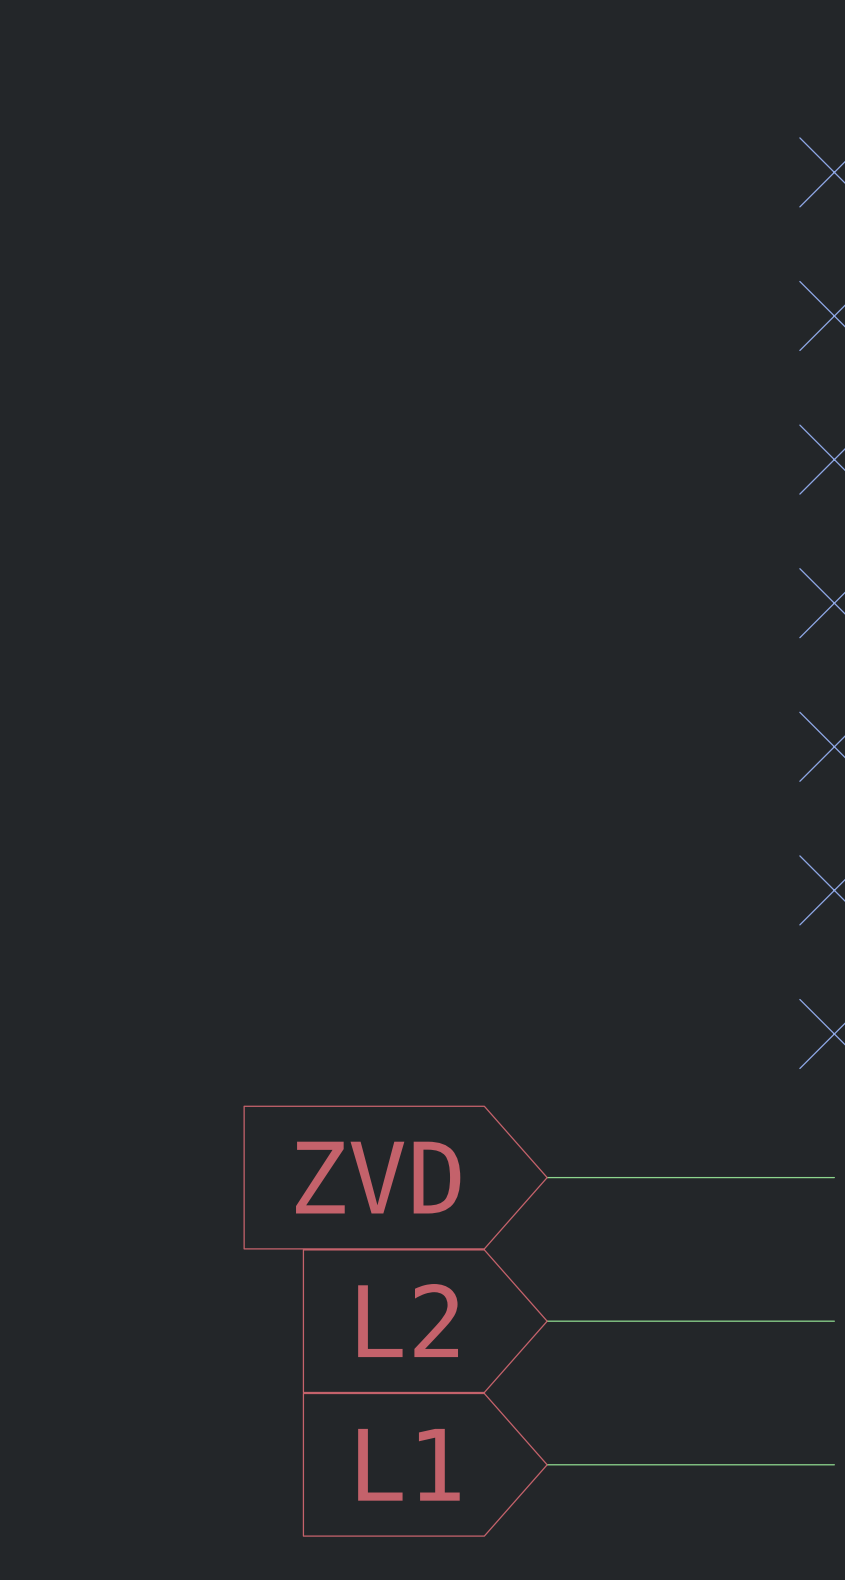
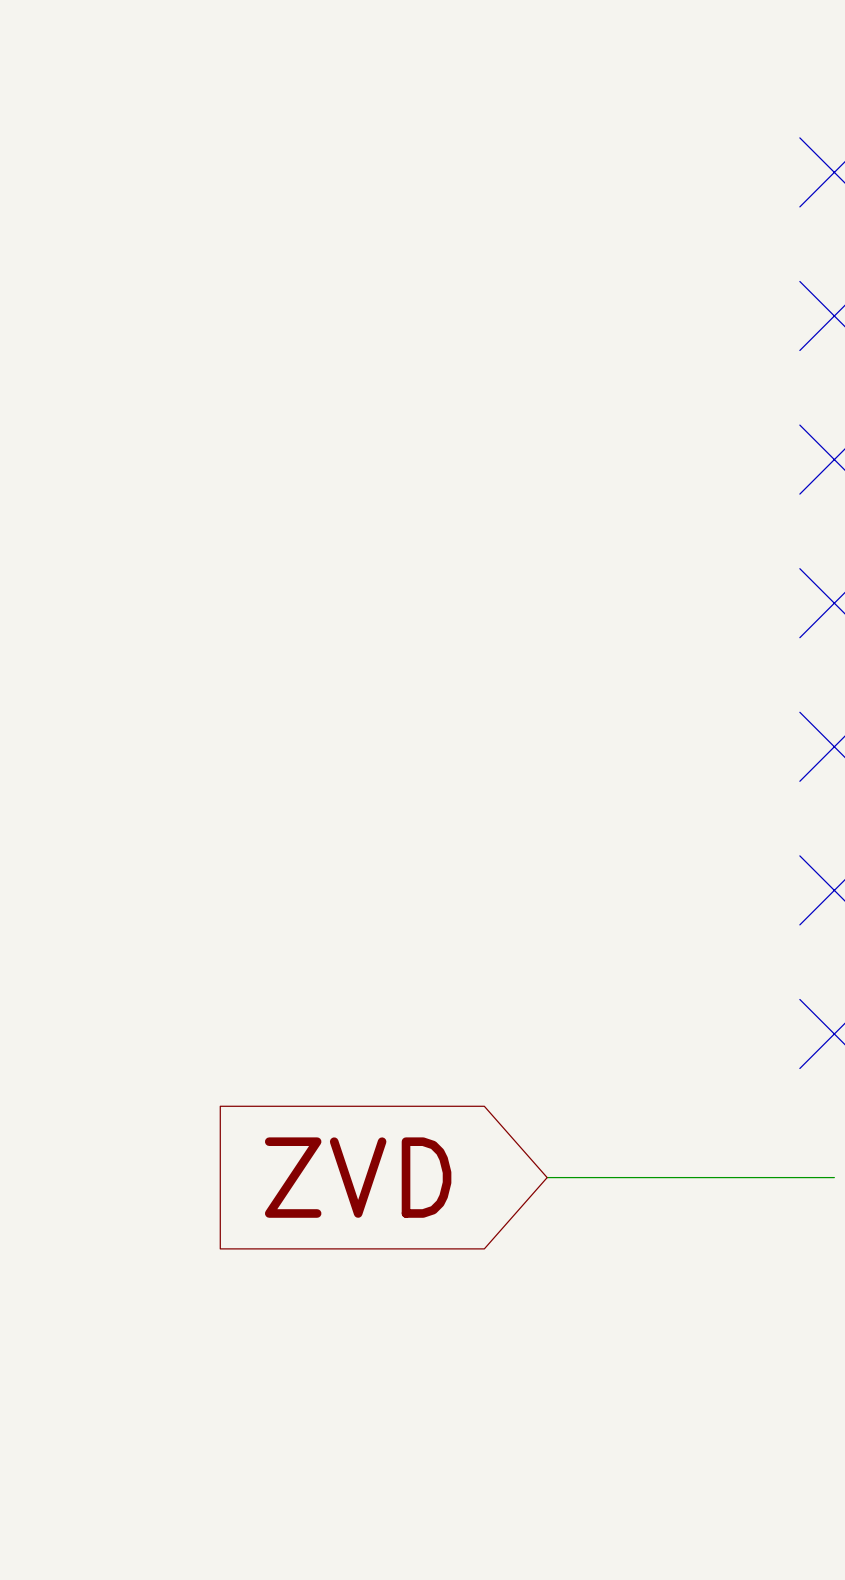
global label: L2 (408, 1320) -> none
wire: (547, 1321) (834, 1321) -> none
global label: L1 (408, 1464) -> none
wire: (547, 1464) (834, 1464) -> none

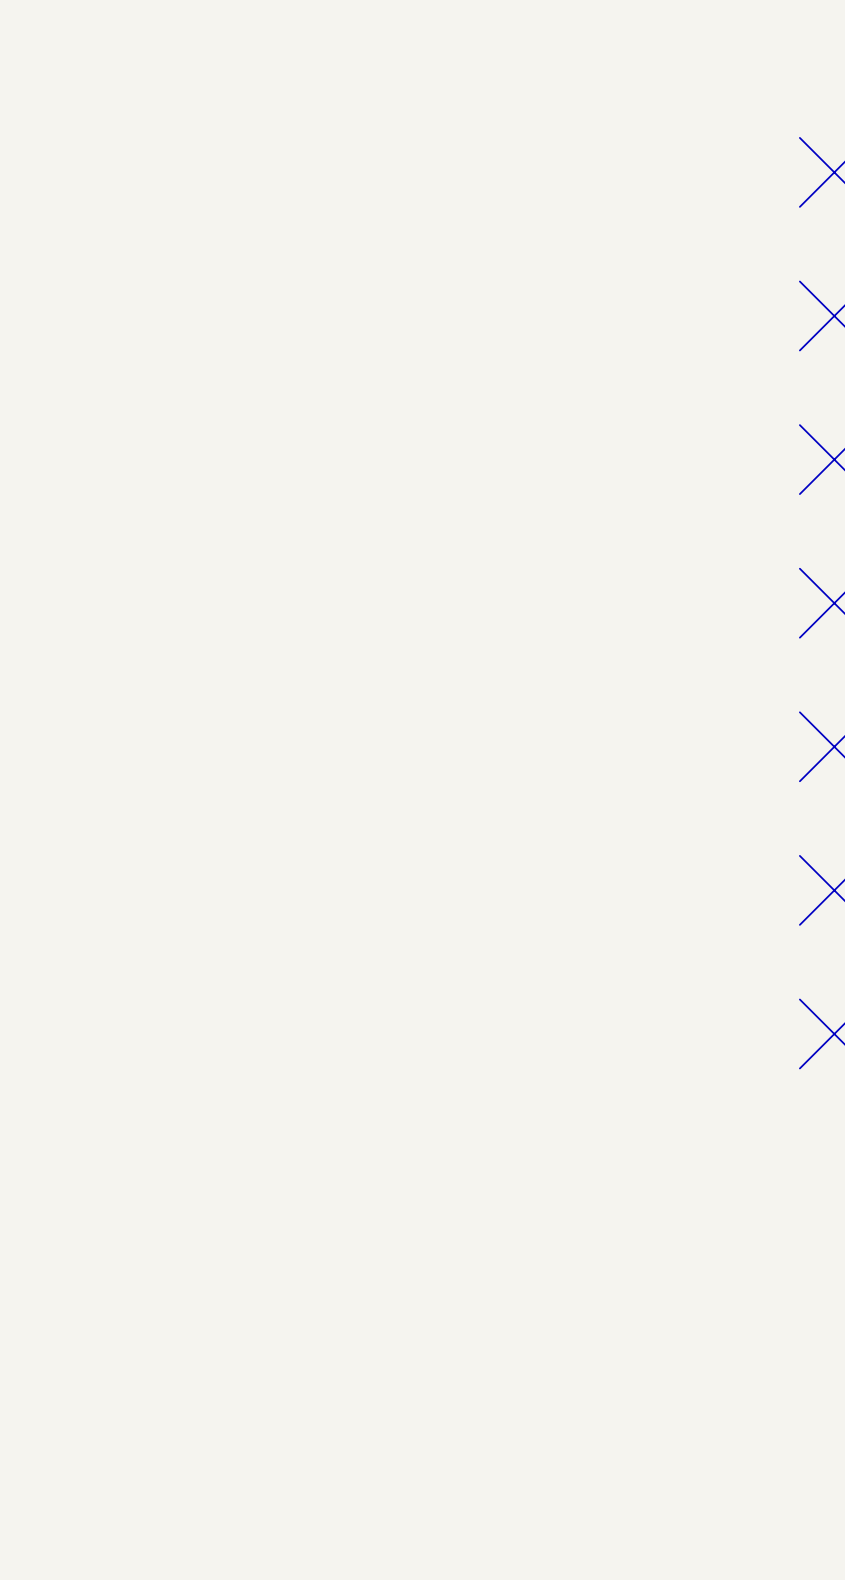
global label: ZVD (358, 1177) -> none
wire: (547, 1177) (834, 1177) -> none

